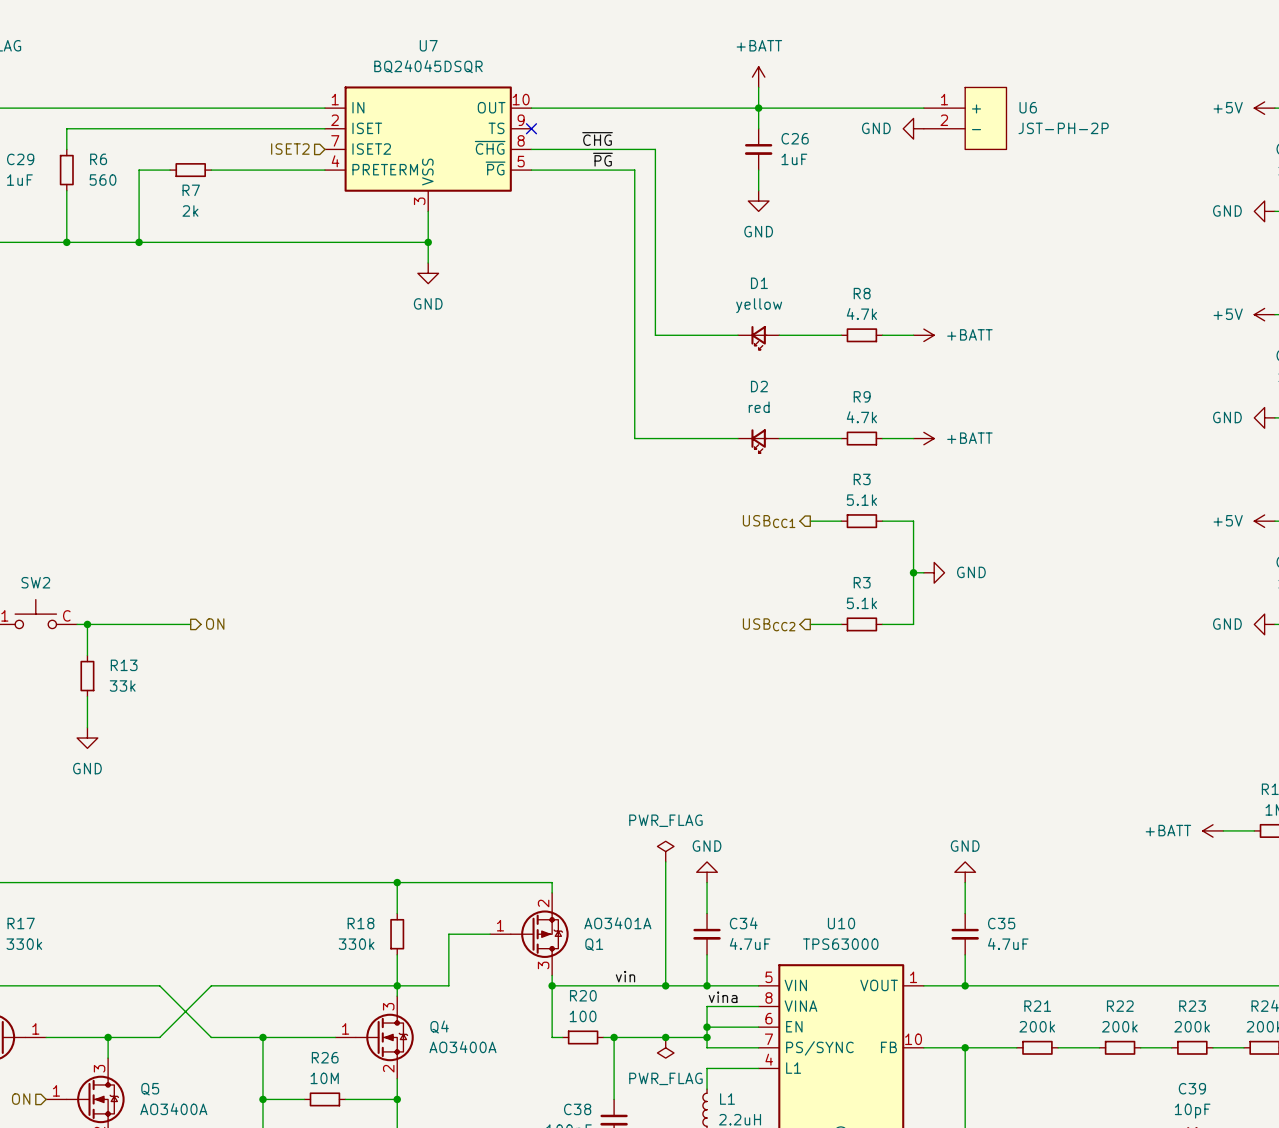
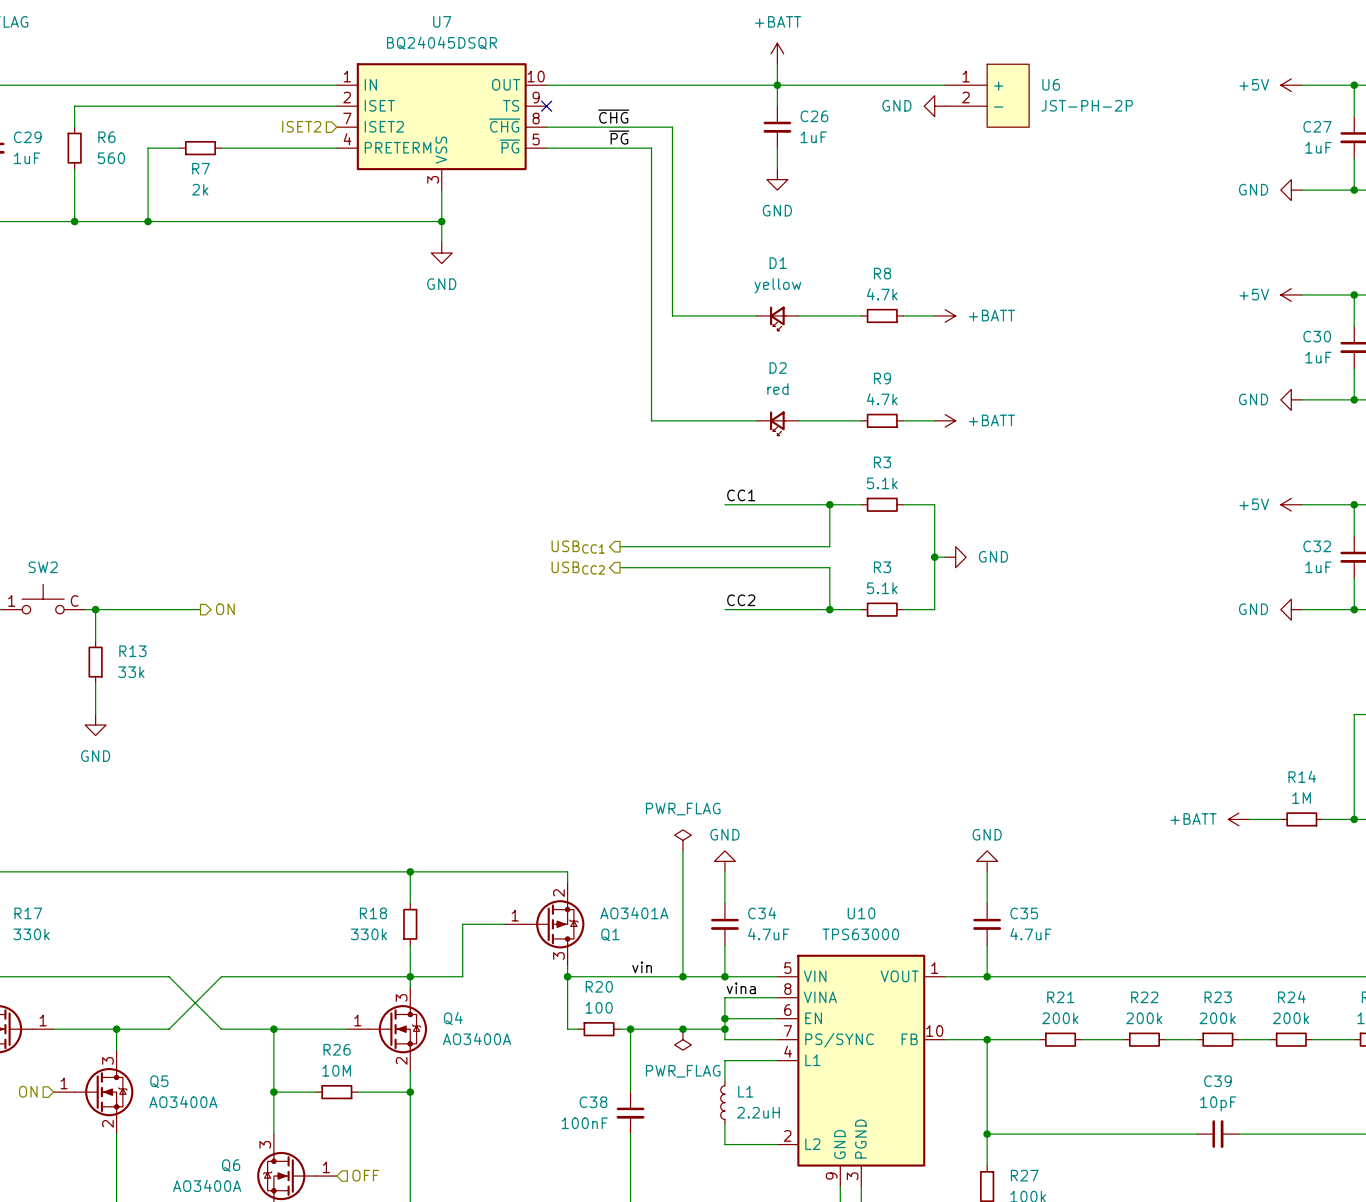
label: none -> CC1 (741, 495)
wire: none -> (724, 504) (829, 504) (829, 546) (620, 546)
hierarchical label: USBCC1 (769, 521) -> none
junction: none -> (829, 504)
hierarchical label: none -> USBCC1 (578, 547)
hierarchical label: none -> USBCC2 (578, 568)
wire: none -> (620, 567) (829, 567) (829, 609) (724, 609)
label: none -> CC2 (741, 600)
hierarchical label: USBCC2 (769, 624) -> none
junction: none -> (829, 609)

